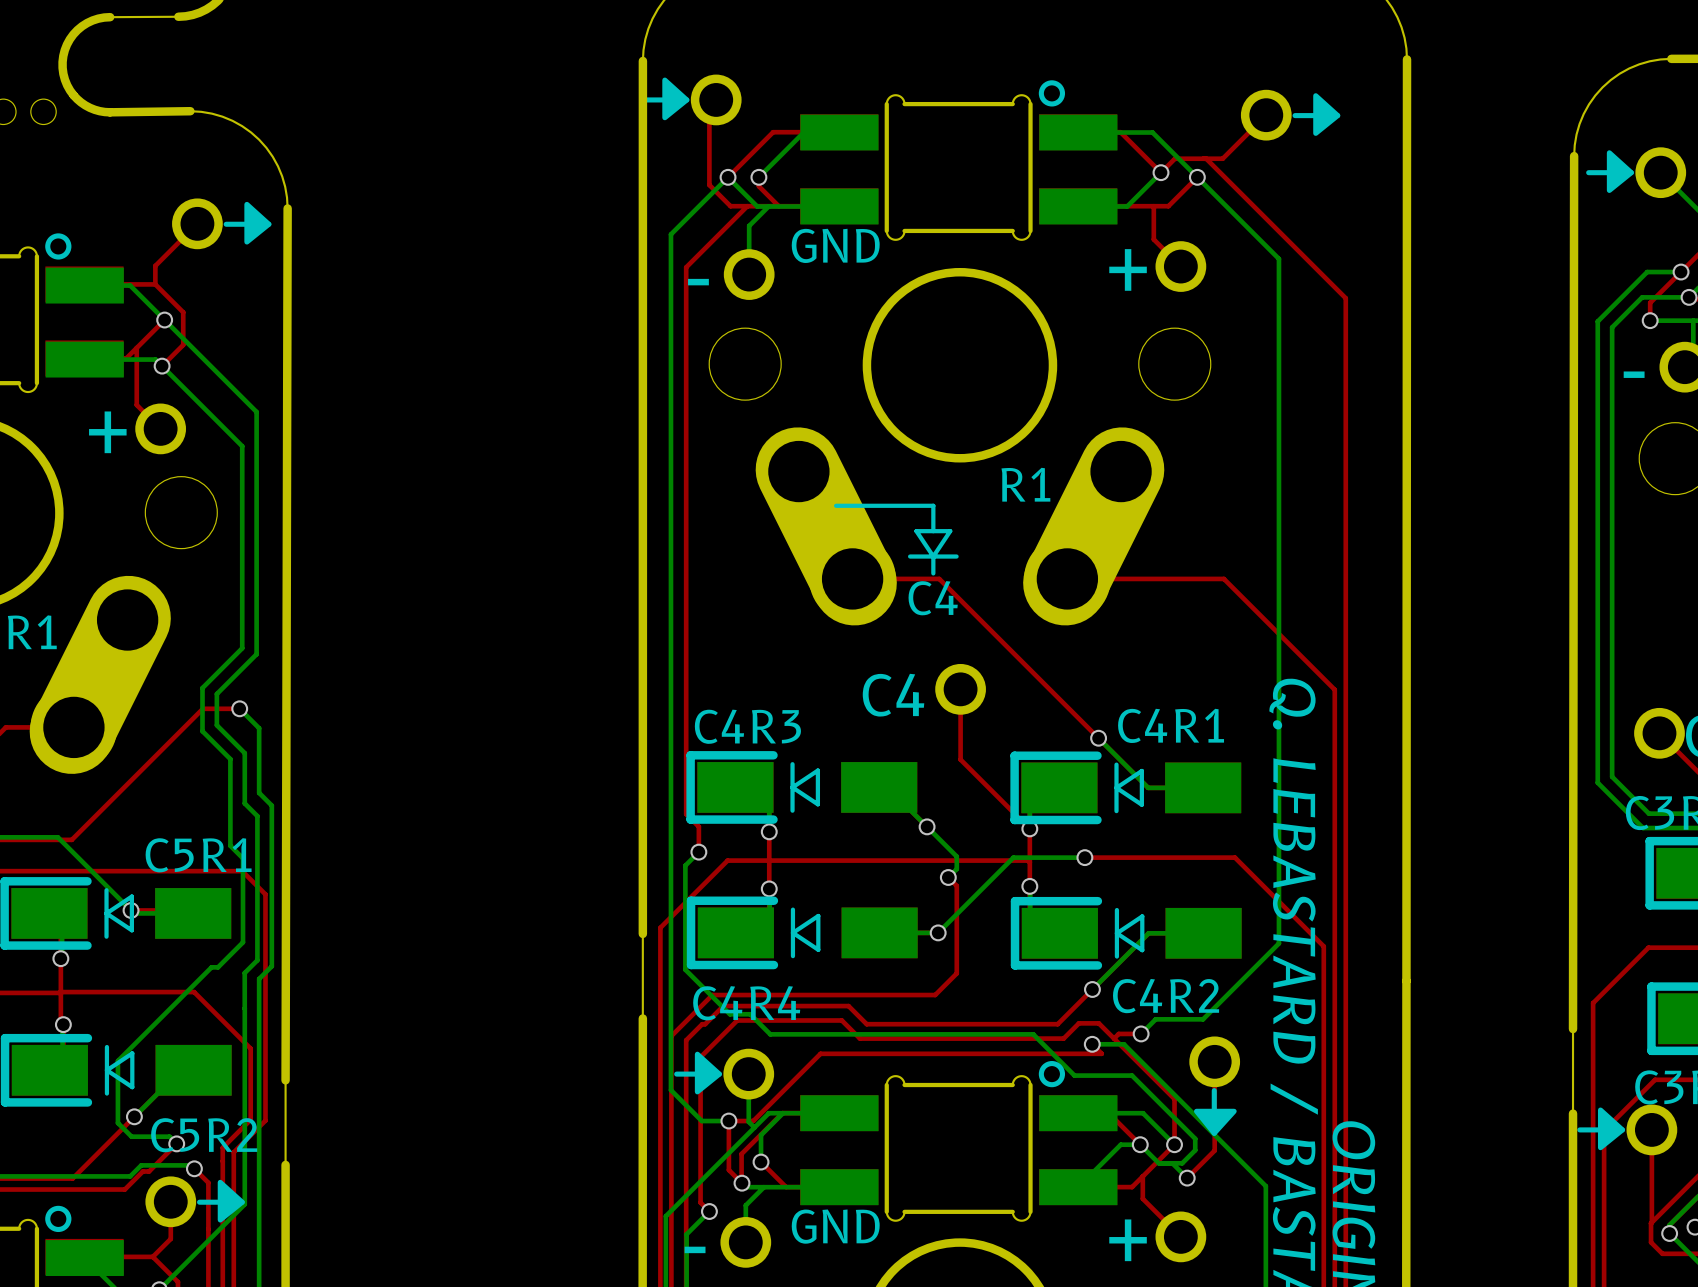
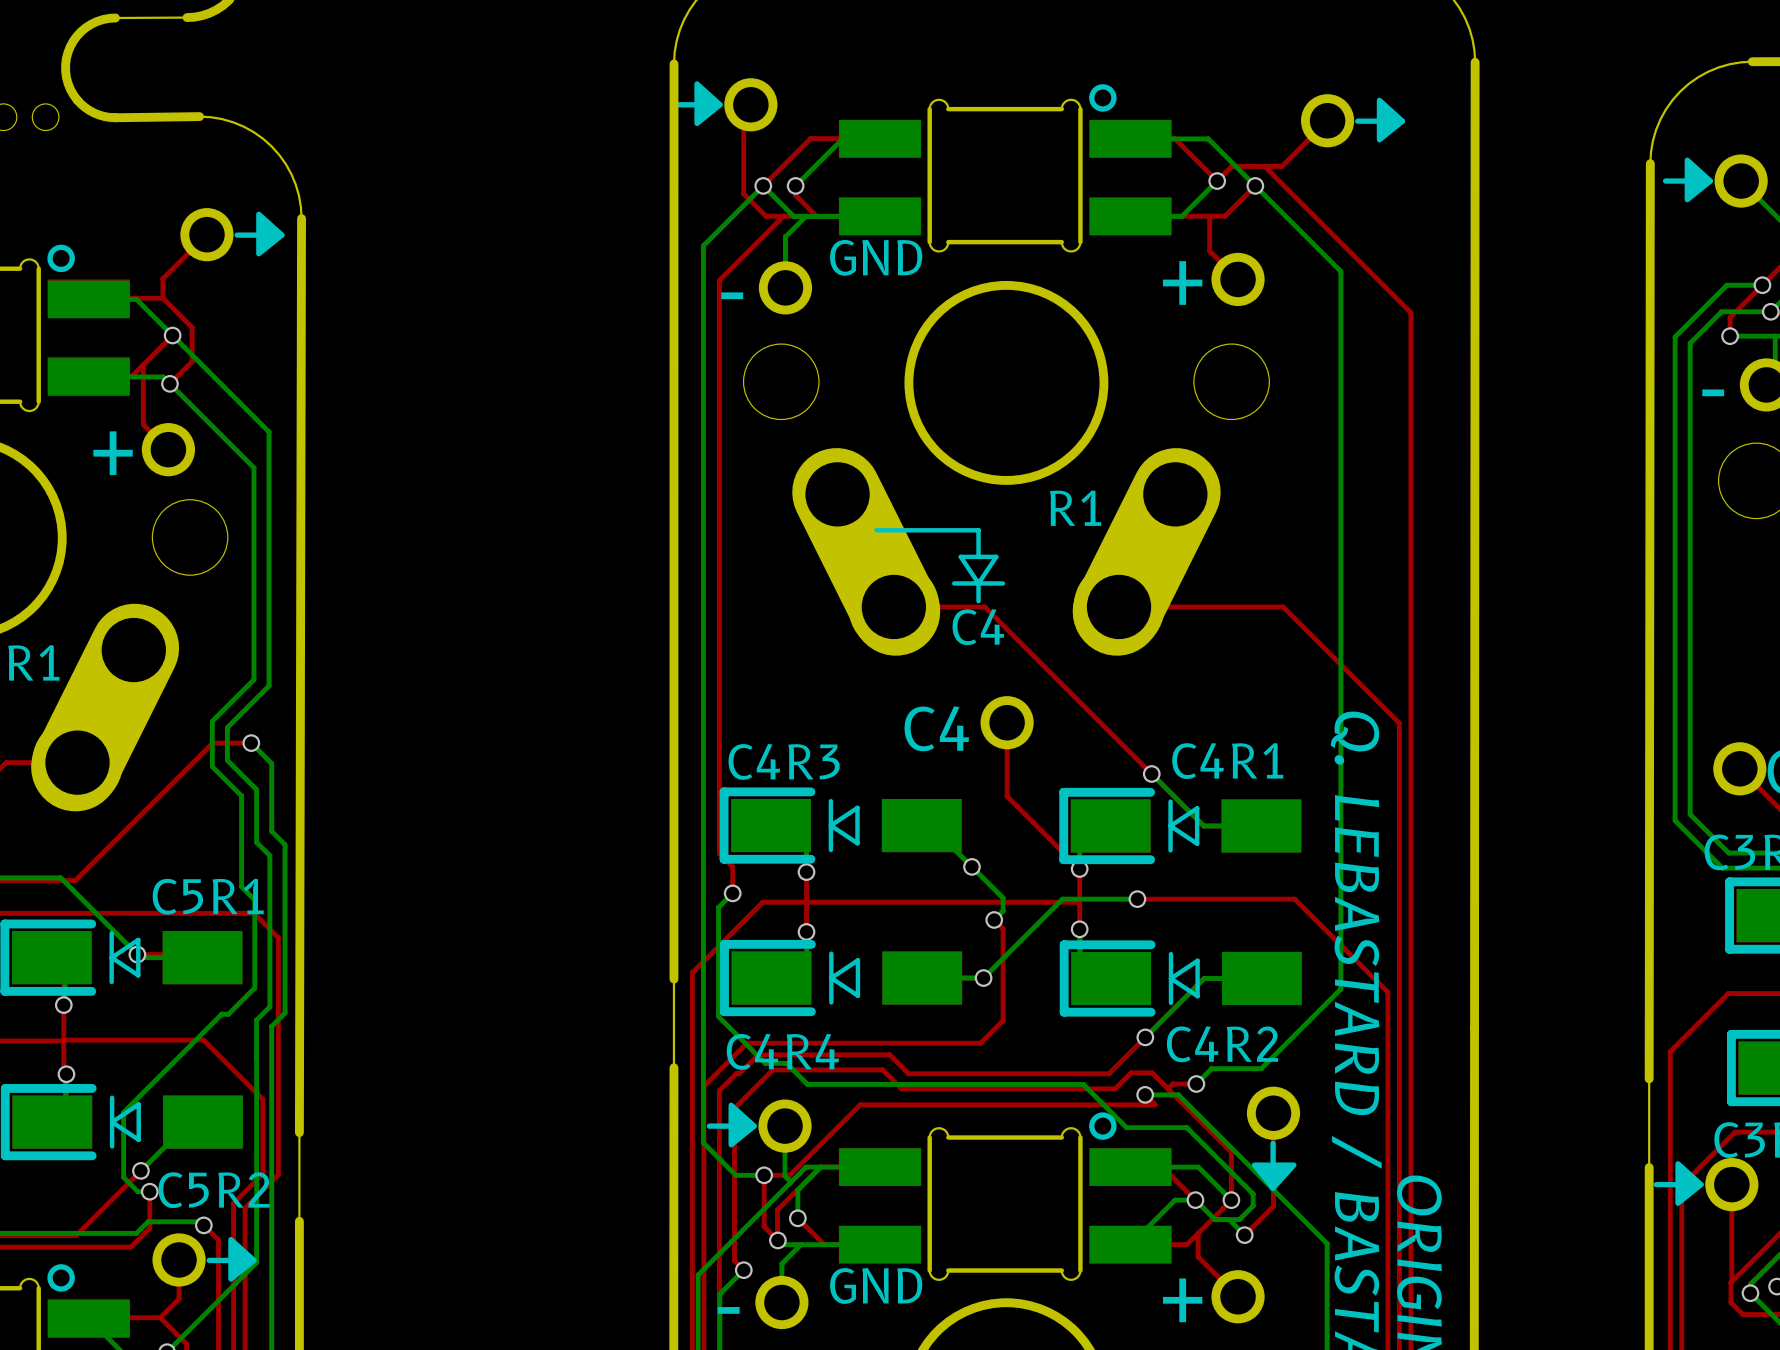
bottom track: (142, 1136) (169, 1136) (176, 1143) -> none
top track: (176, 1143) (149, 1171) (142, 1171) -> (149, 1191) (149, 1228)
via position: (176, 1143) -> (149, 1191)

